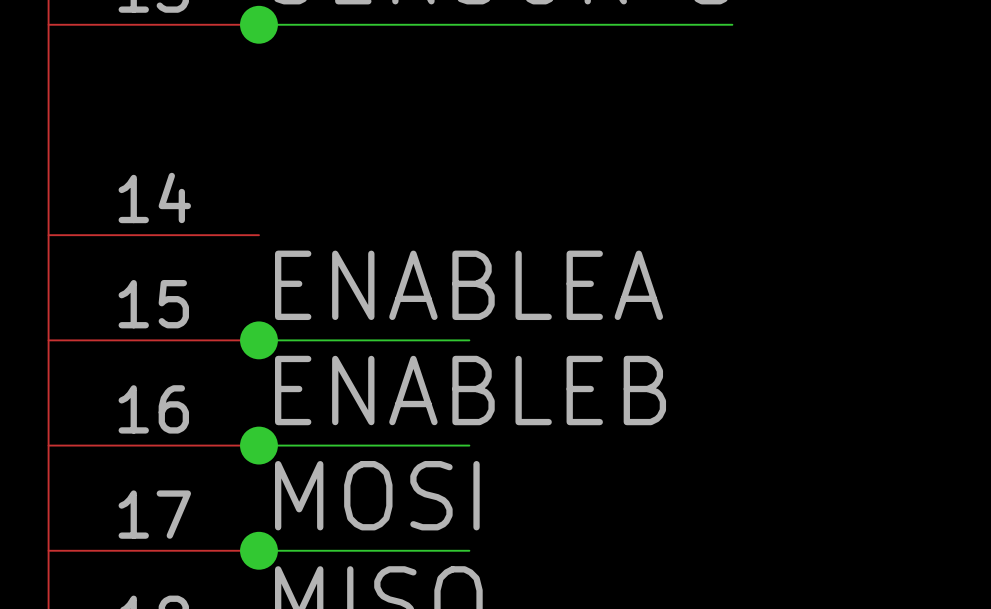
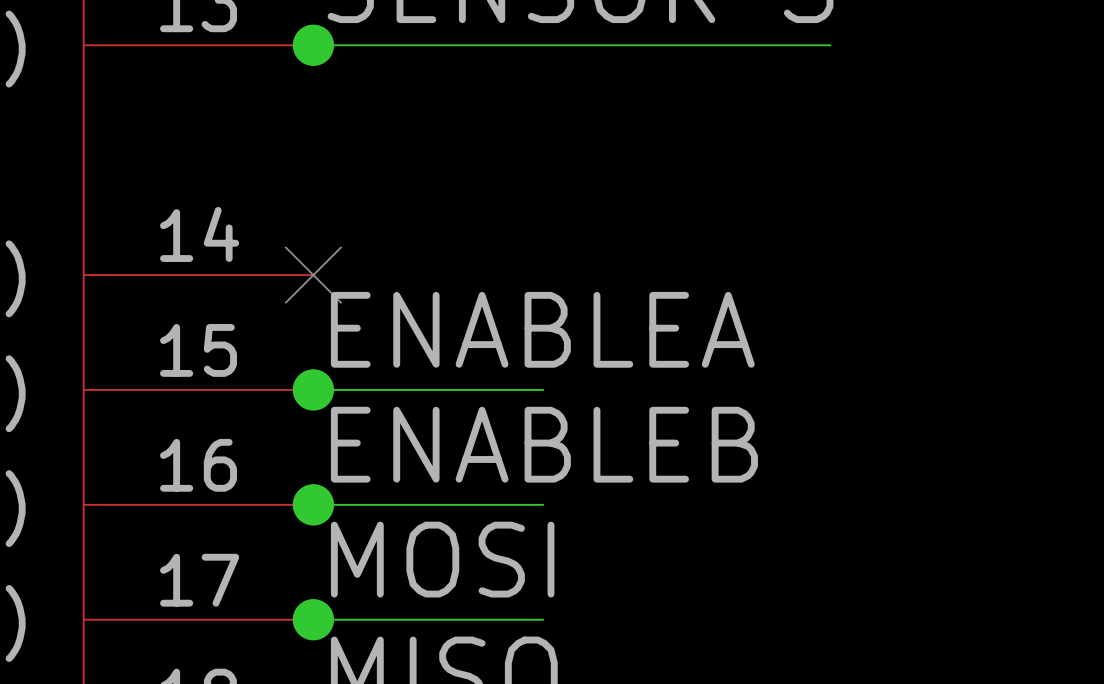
no-connect mark: none -> (313, 275)

